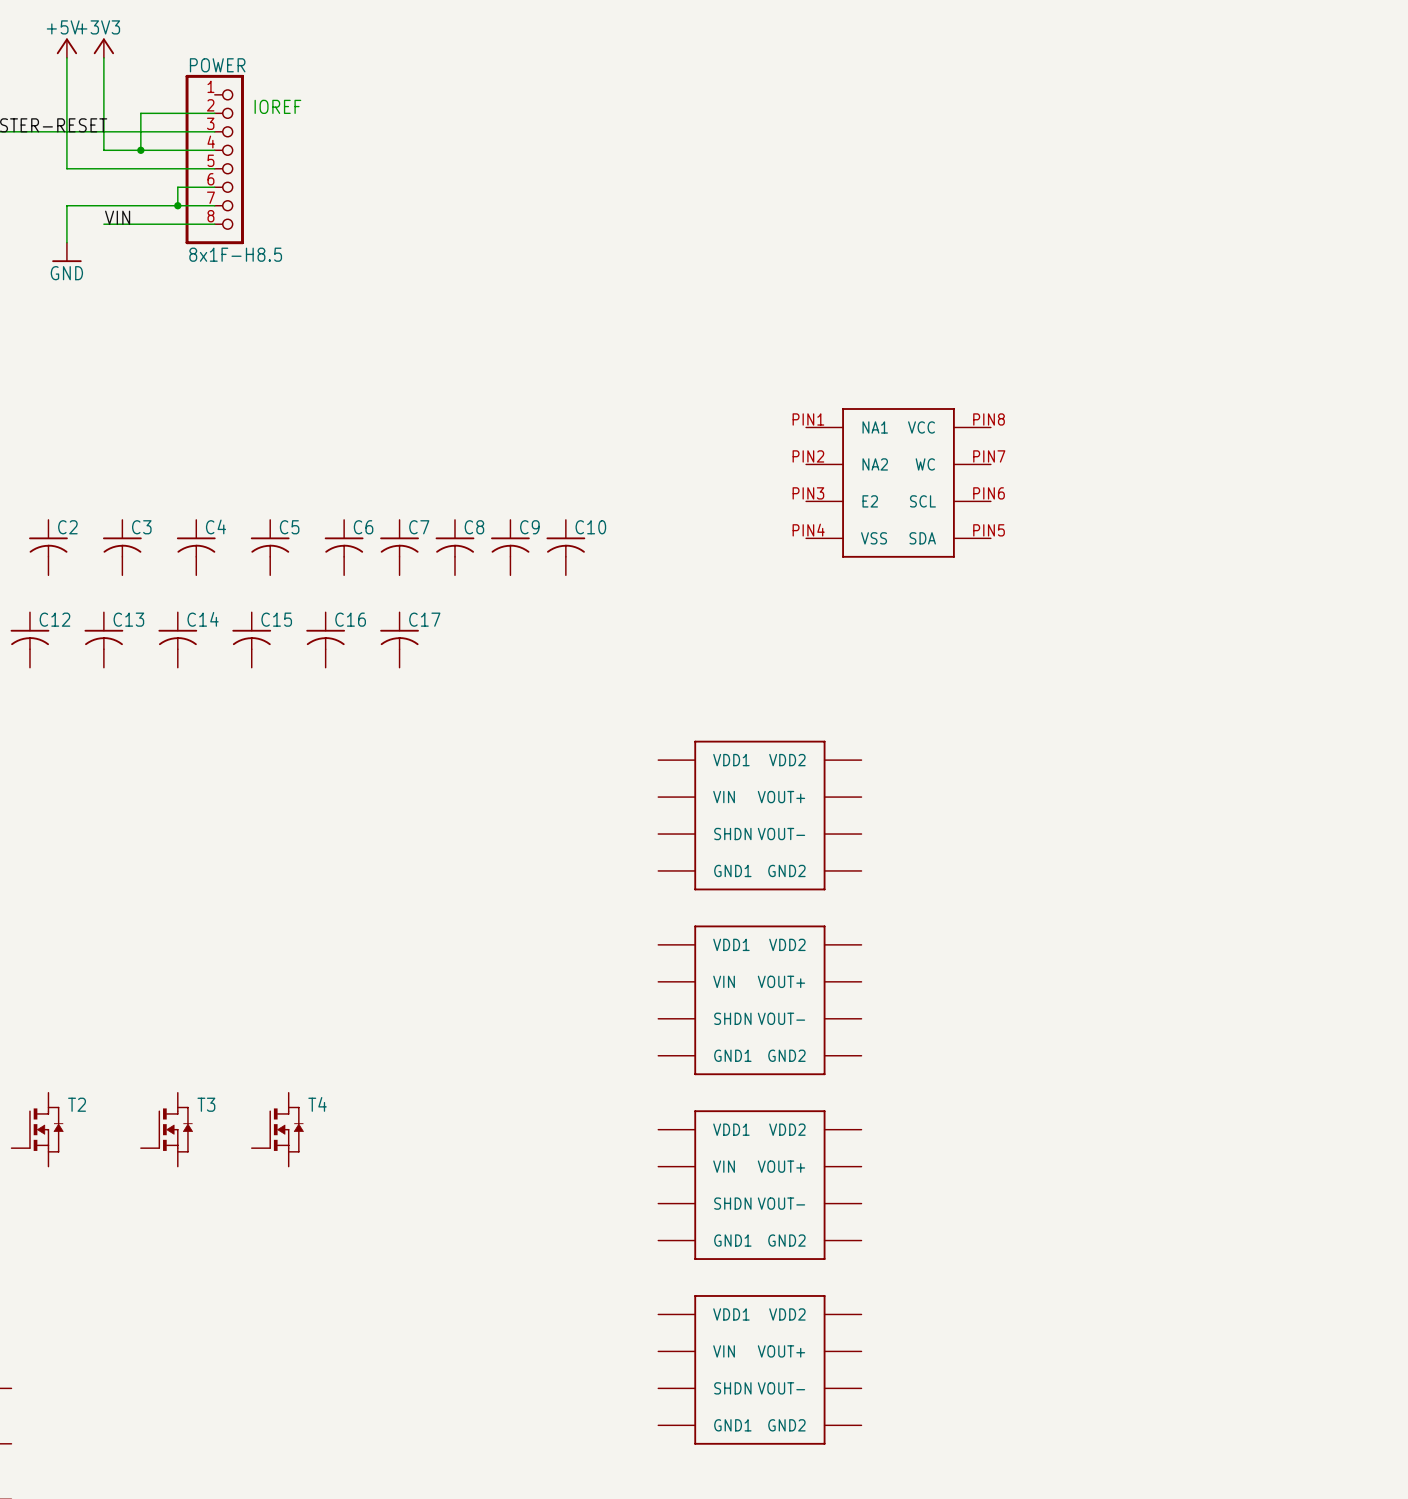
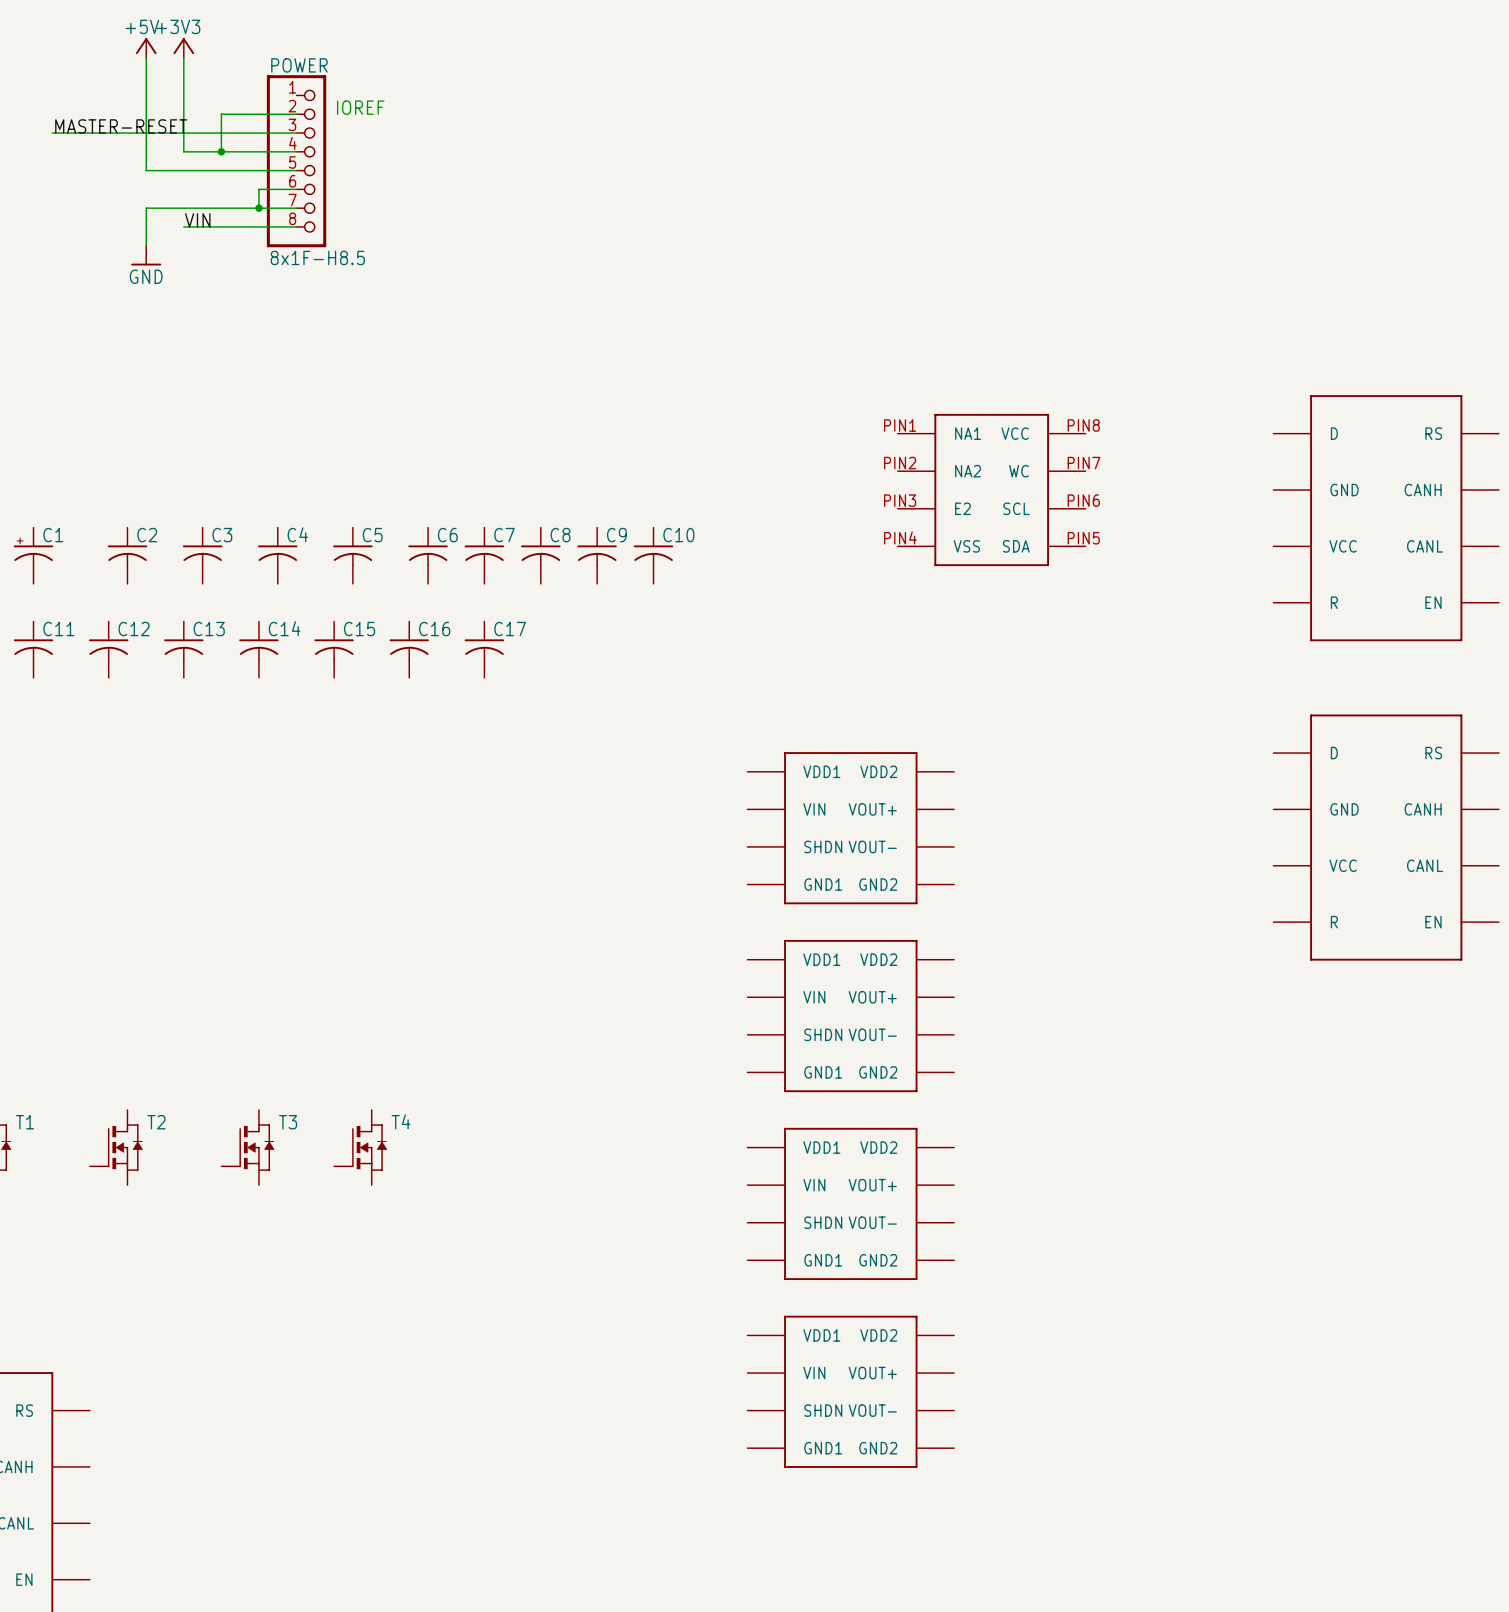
part: none -> (1386, 518)
part: none -> (1386, 837)

